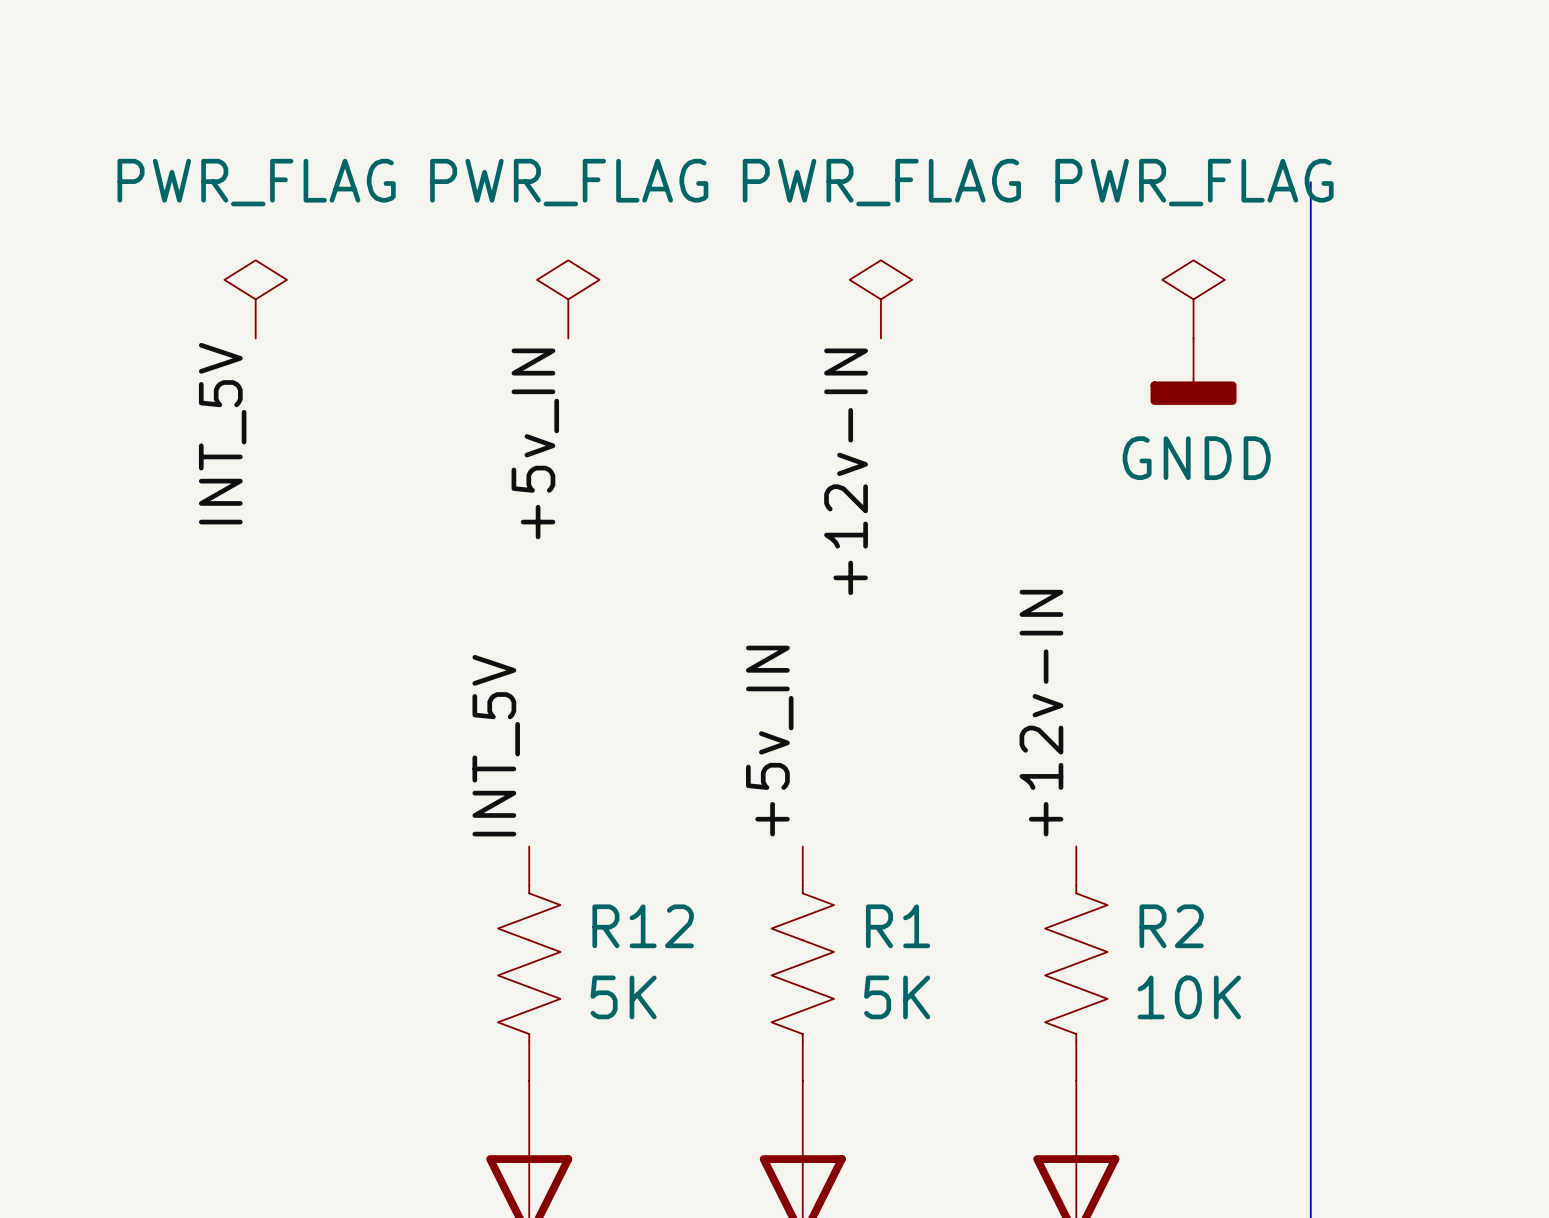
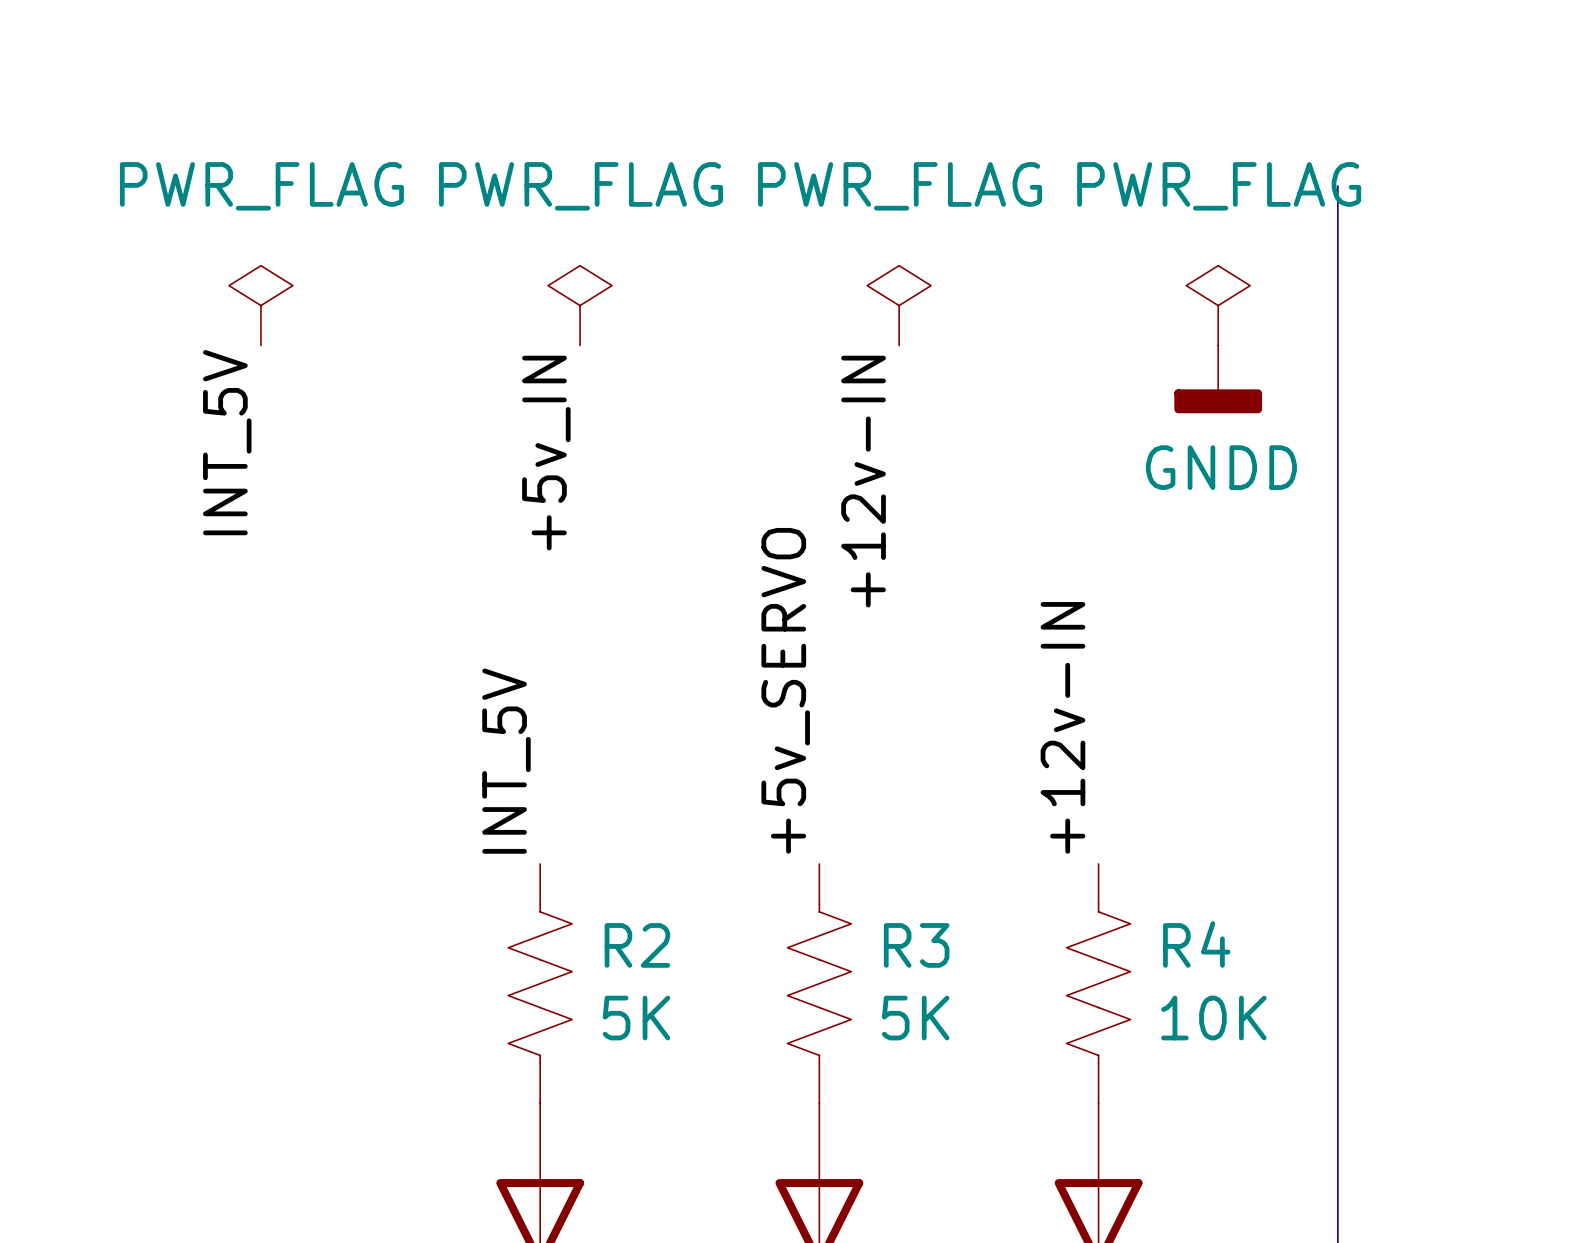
label: +5v_IN (769, 741) -> +5v_SERVO (785, 690)
R12 name: R12 (643, 926) -> R2 (637, 945)
R1 name: R1 (898, 926) -> R3 (916, 945)
R2 name: R2 (1171, 926) -> R4 (1196, 944)

